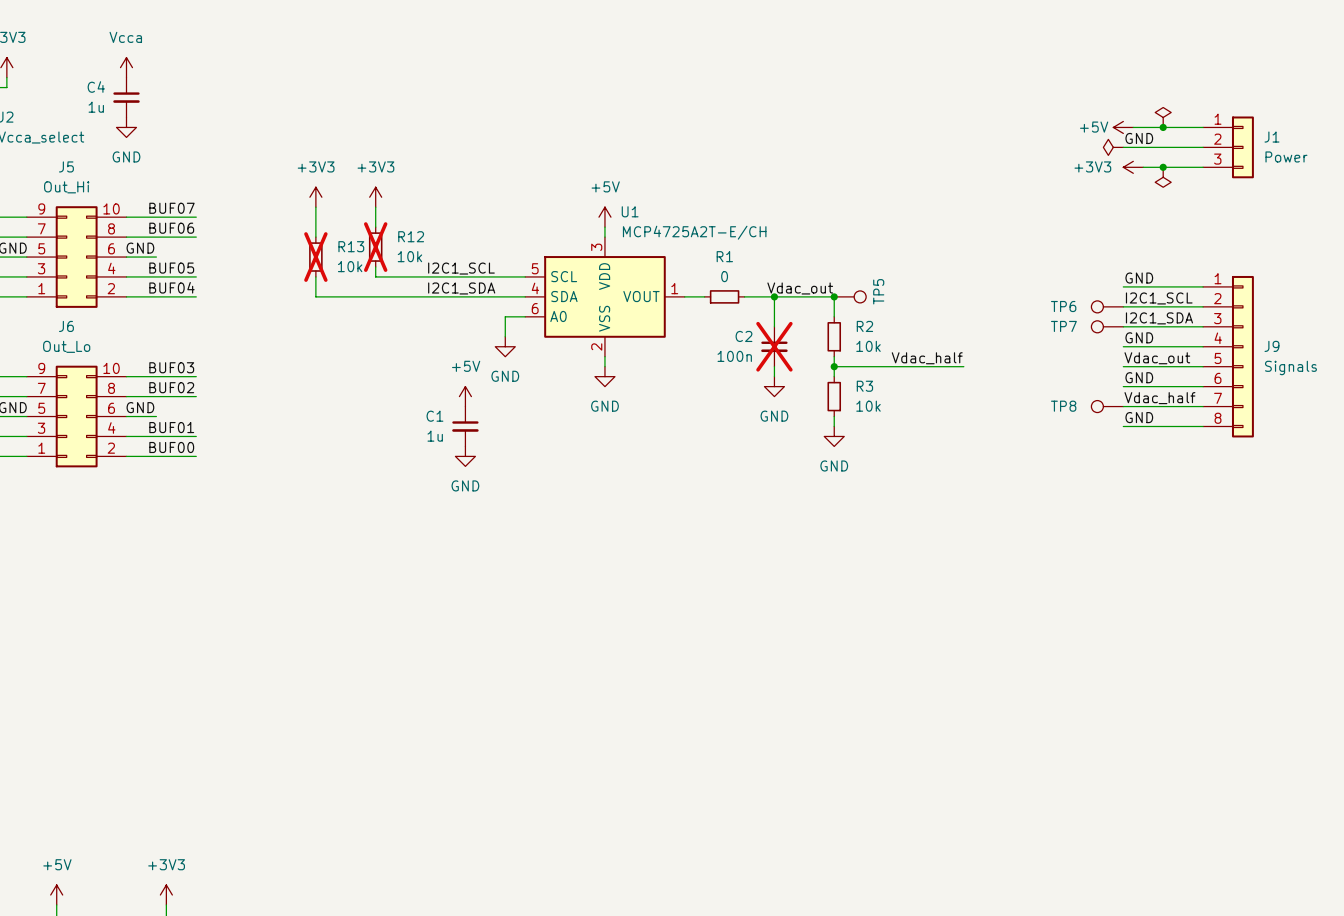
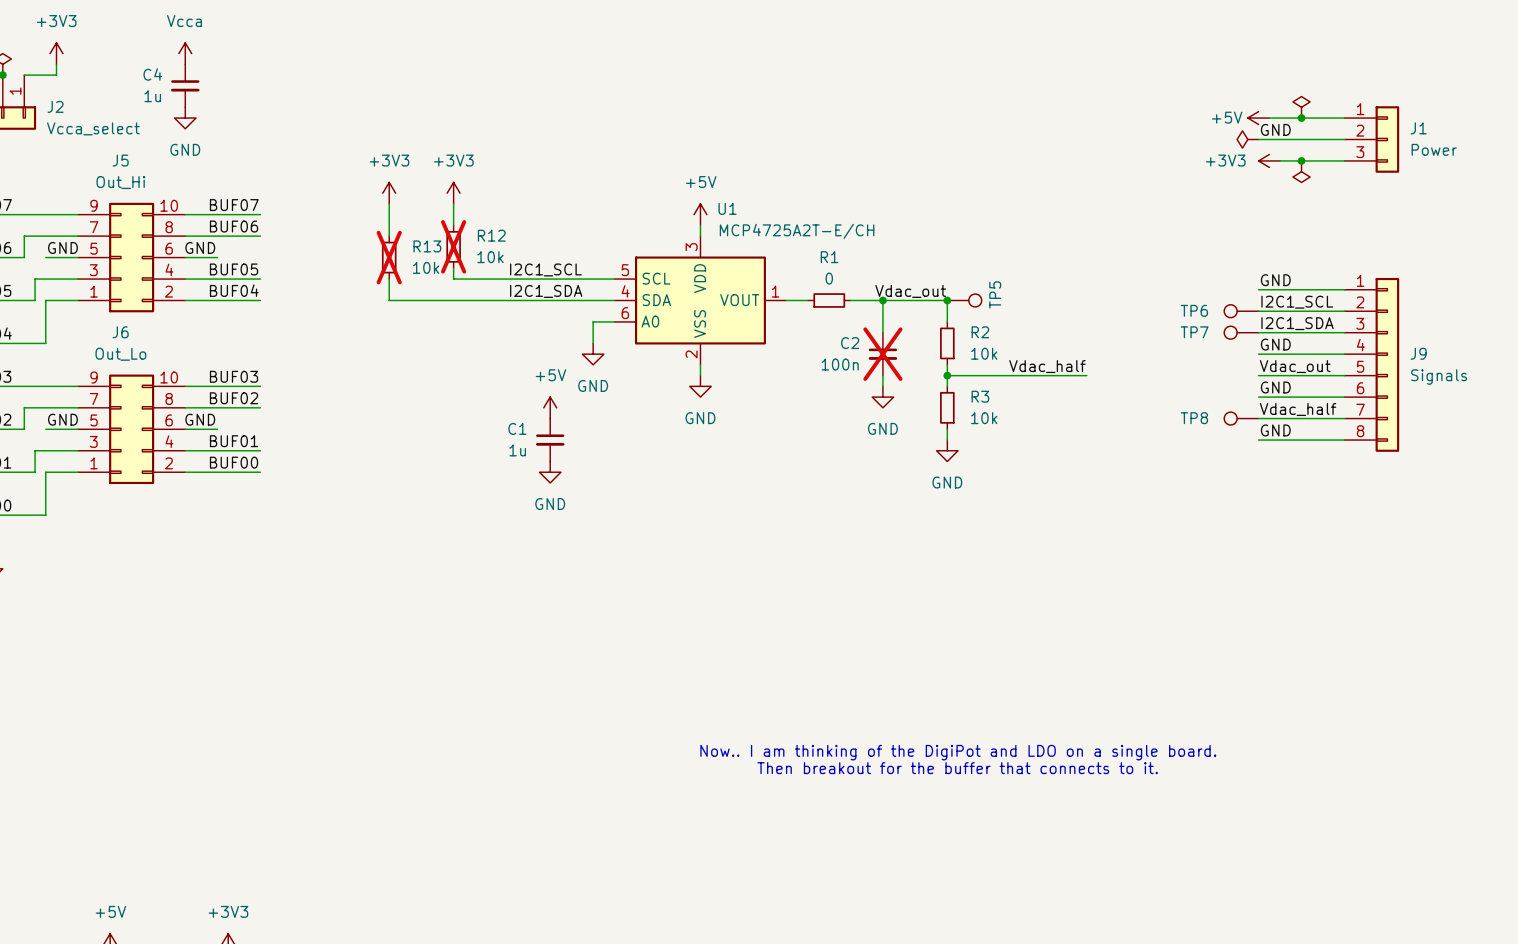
text: none -> Now.. I am thinking of the DigiPot and LDO on a single board. (958, 752)
text: none -> Then breakout for the buffer that connects to it. (957, 768)

